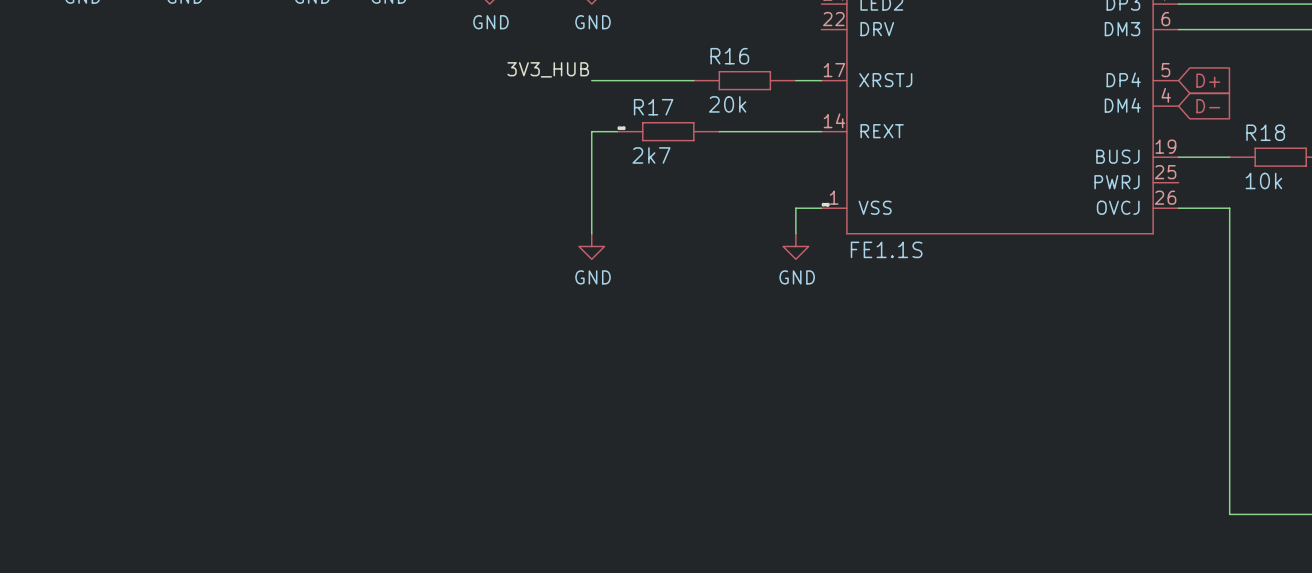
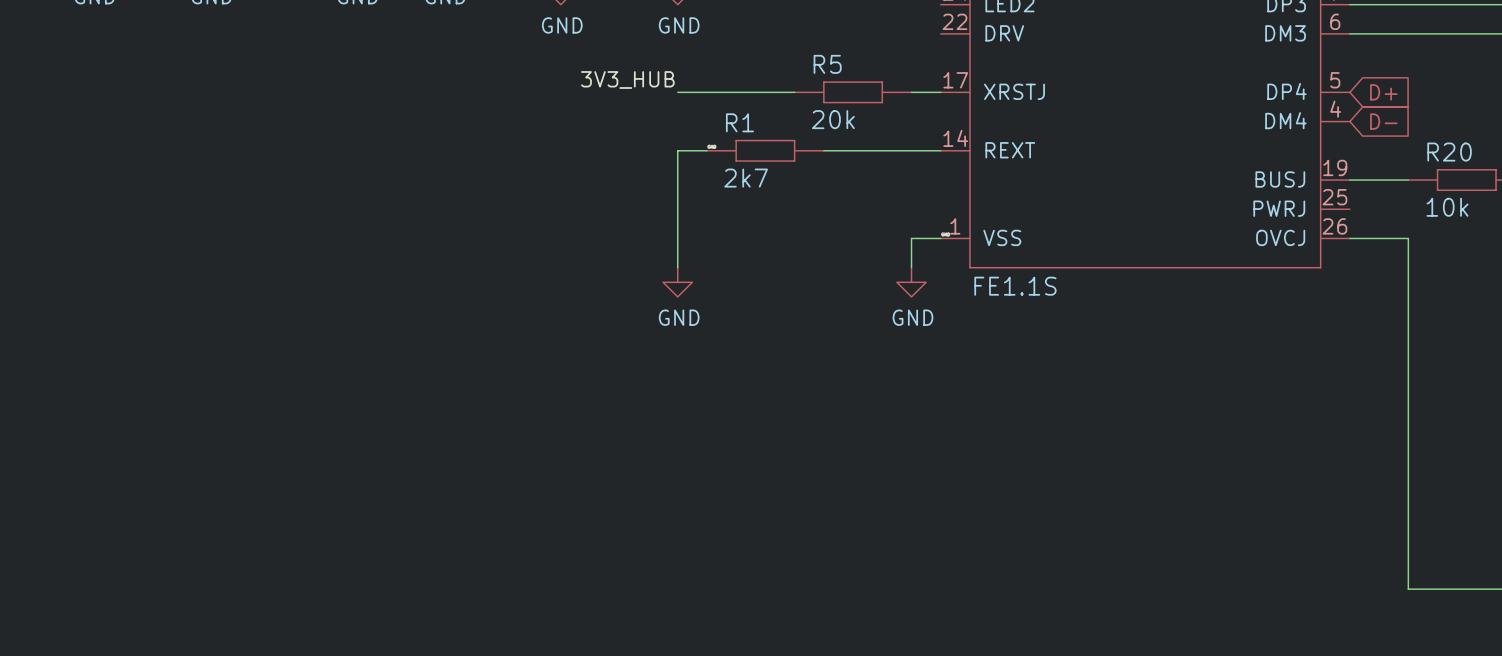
R16 name: R16 (729, 56) -> R5 (827, 64)
R17 name: R17 (653, 107) -> R1 (739, 122)
R18 name: R18 (1265, 132) -> R20 (1449, 152)

